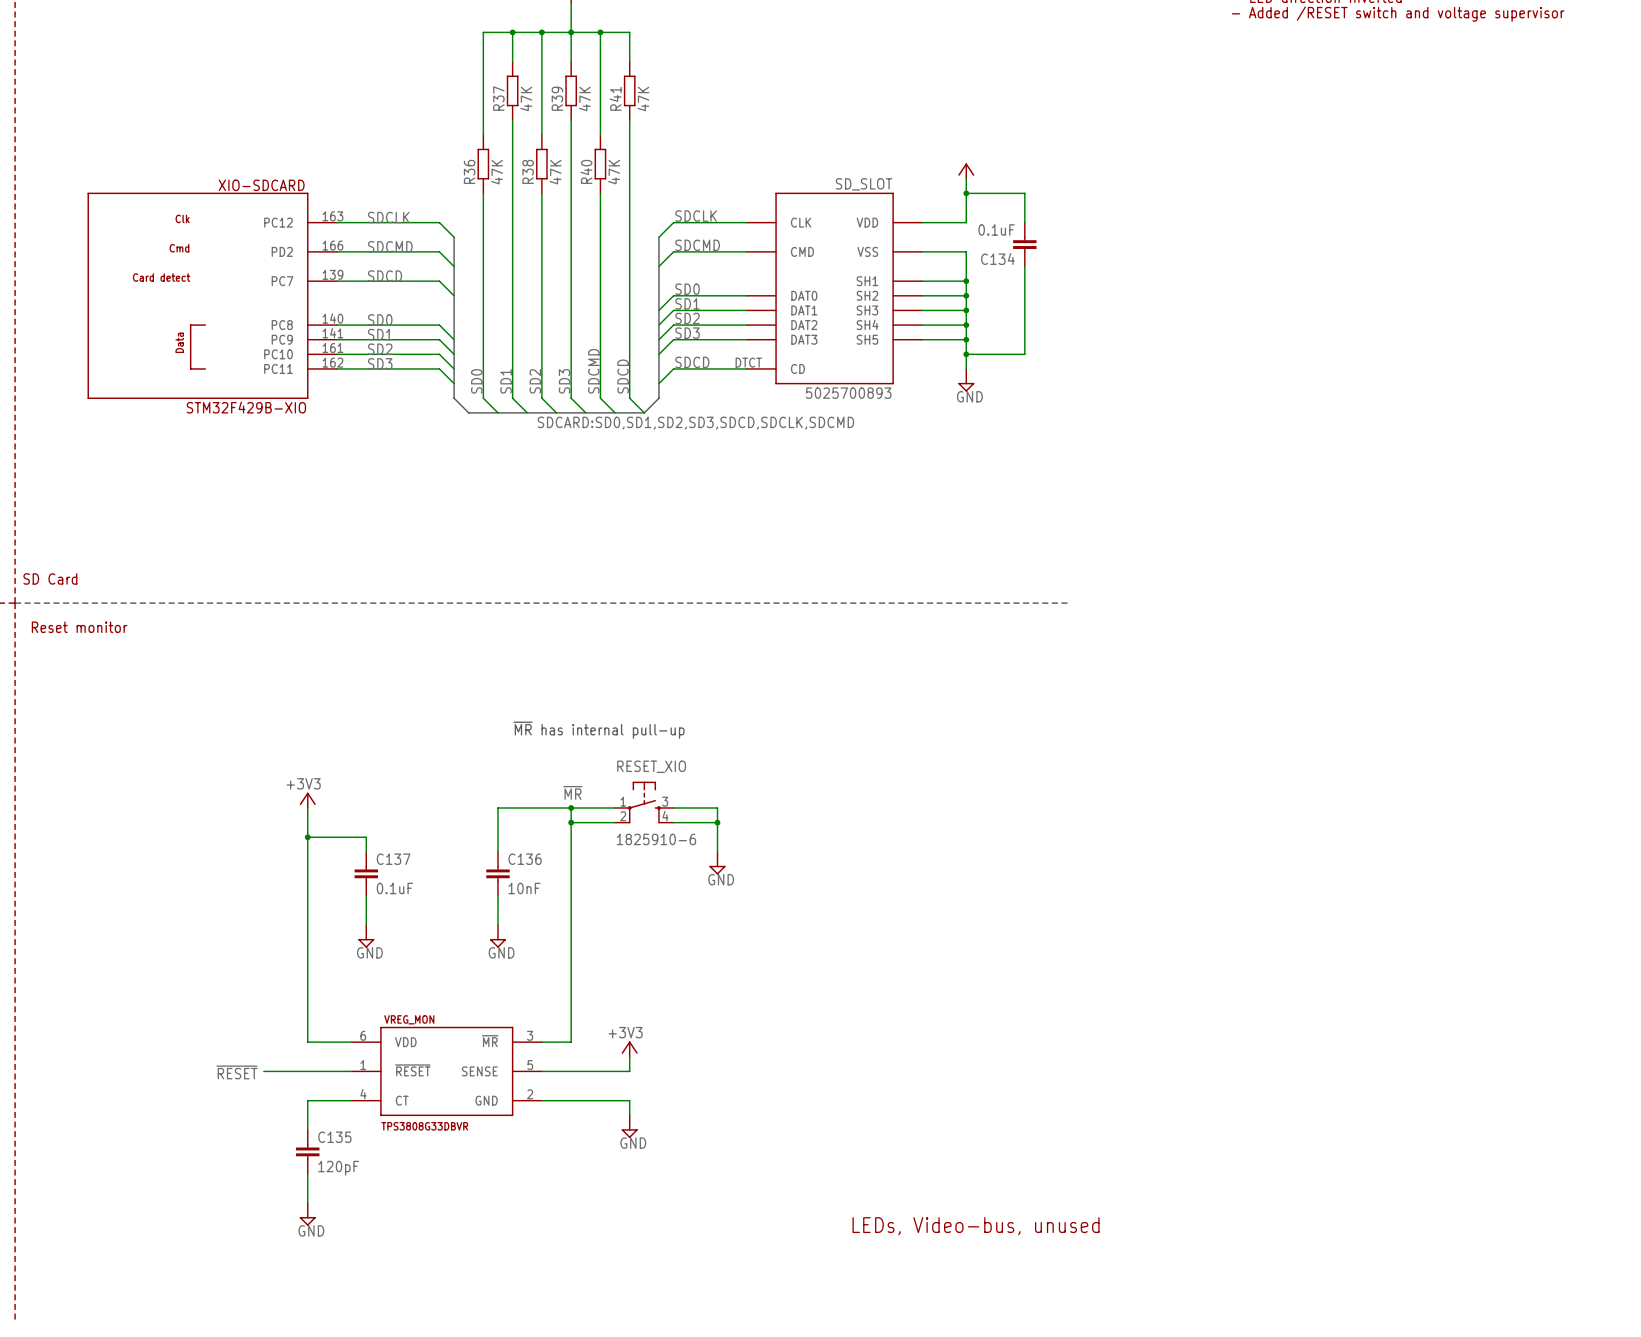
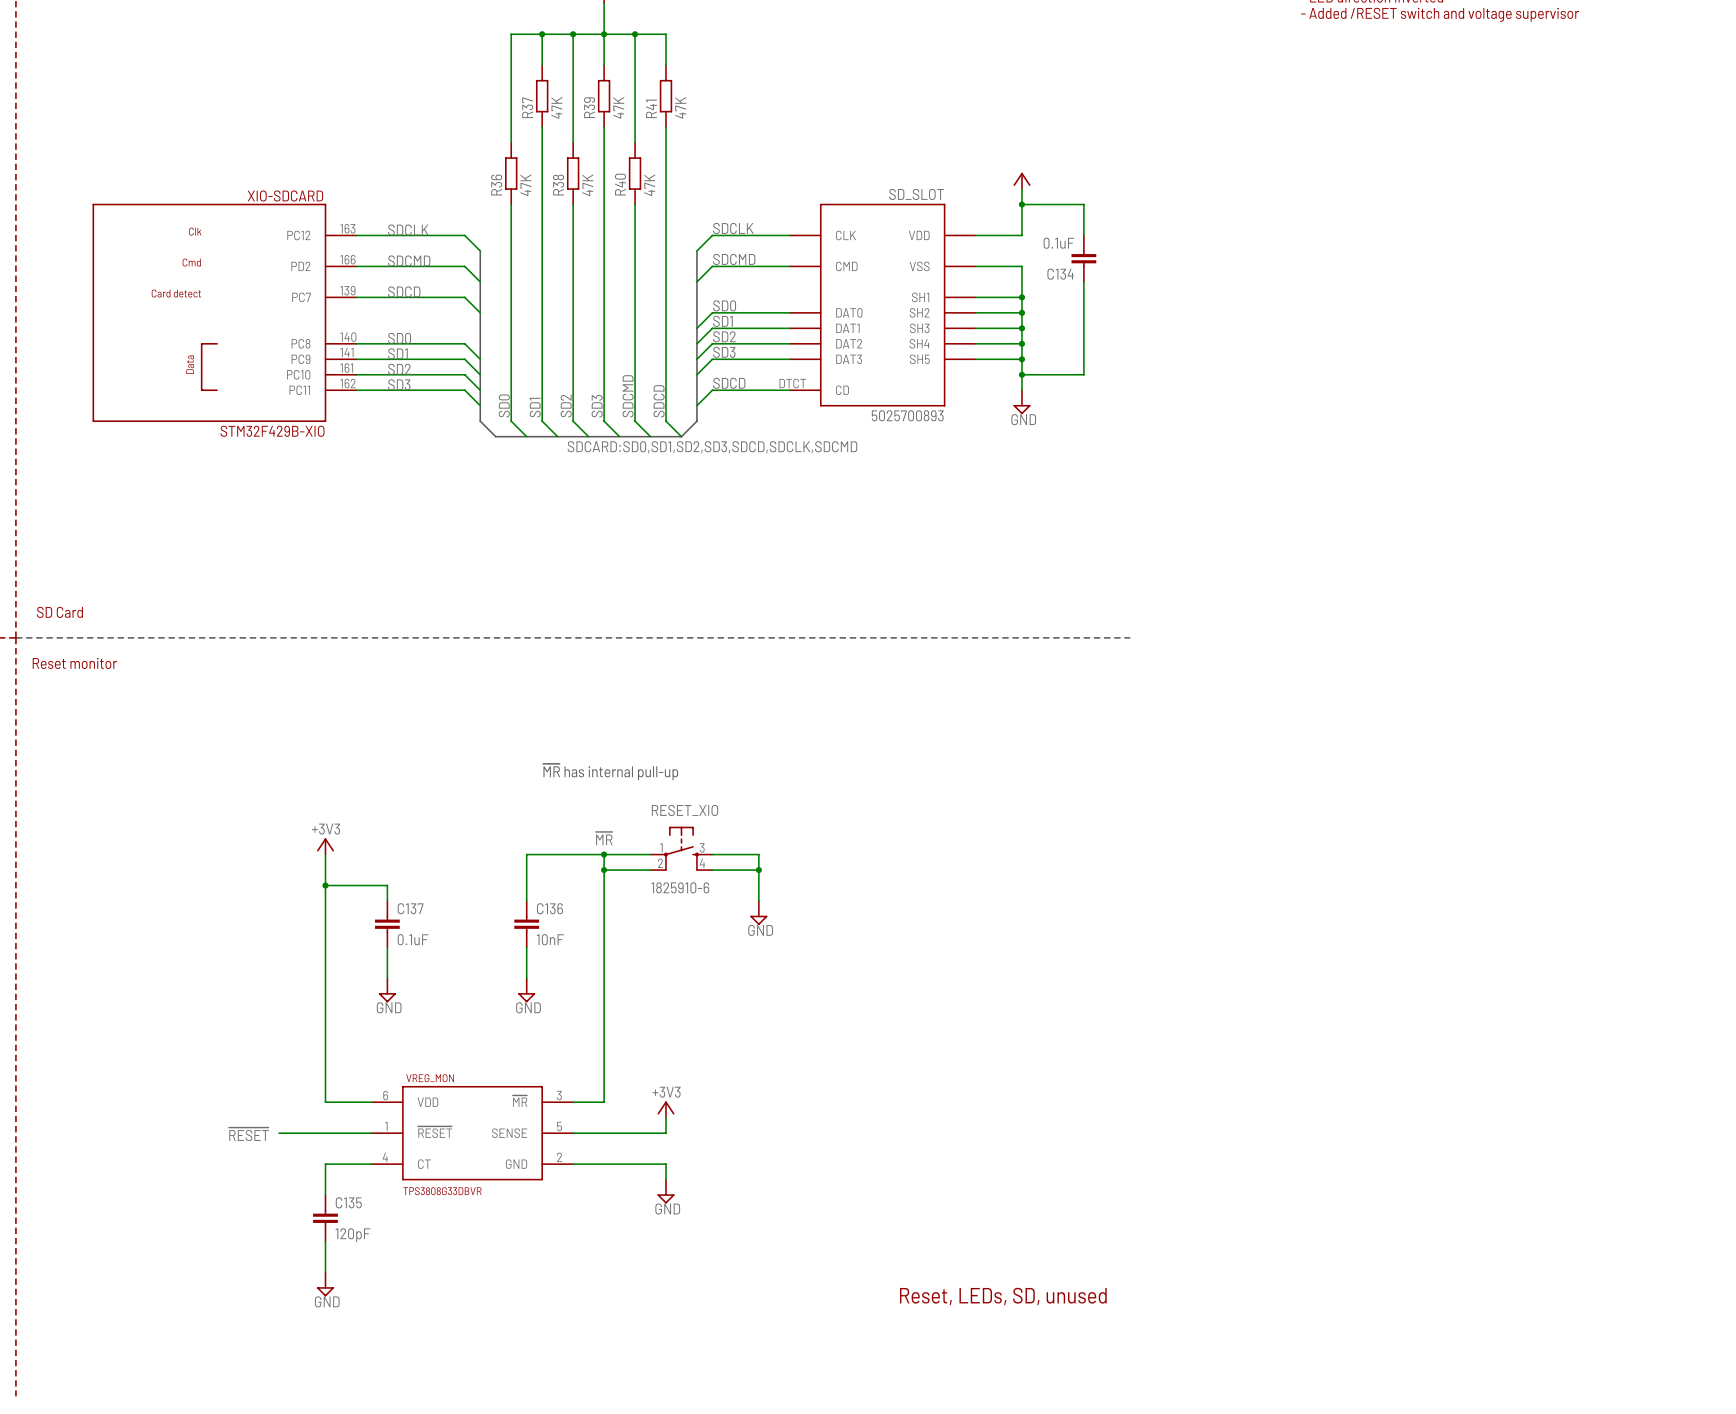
text: LEDs, Video-bus, unused (976, 1226) -> Reset, LEDs, SD, unused (1003, 1296)

